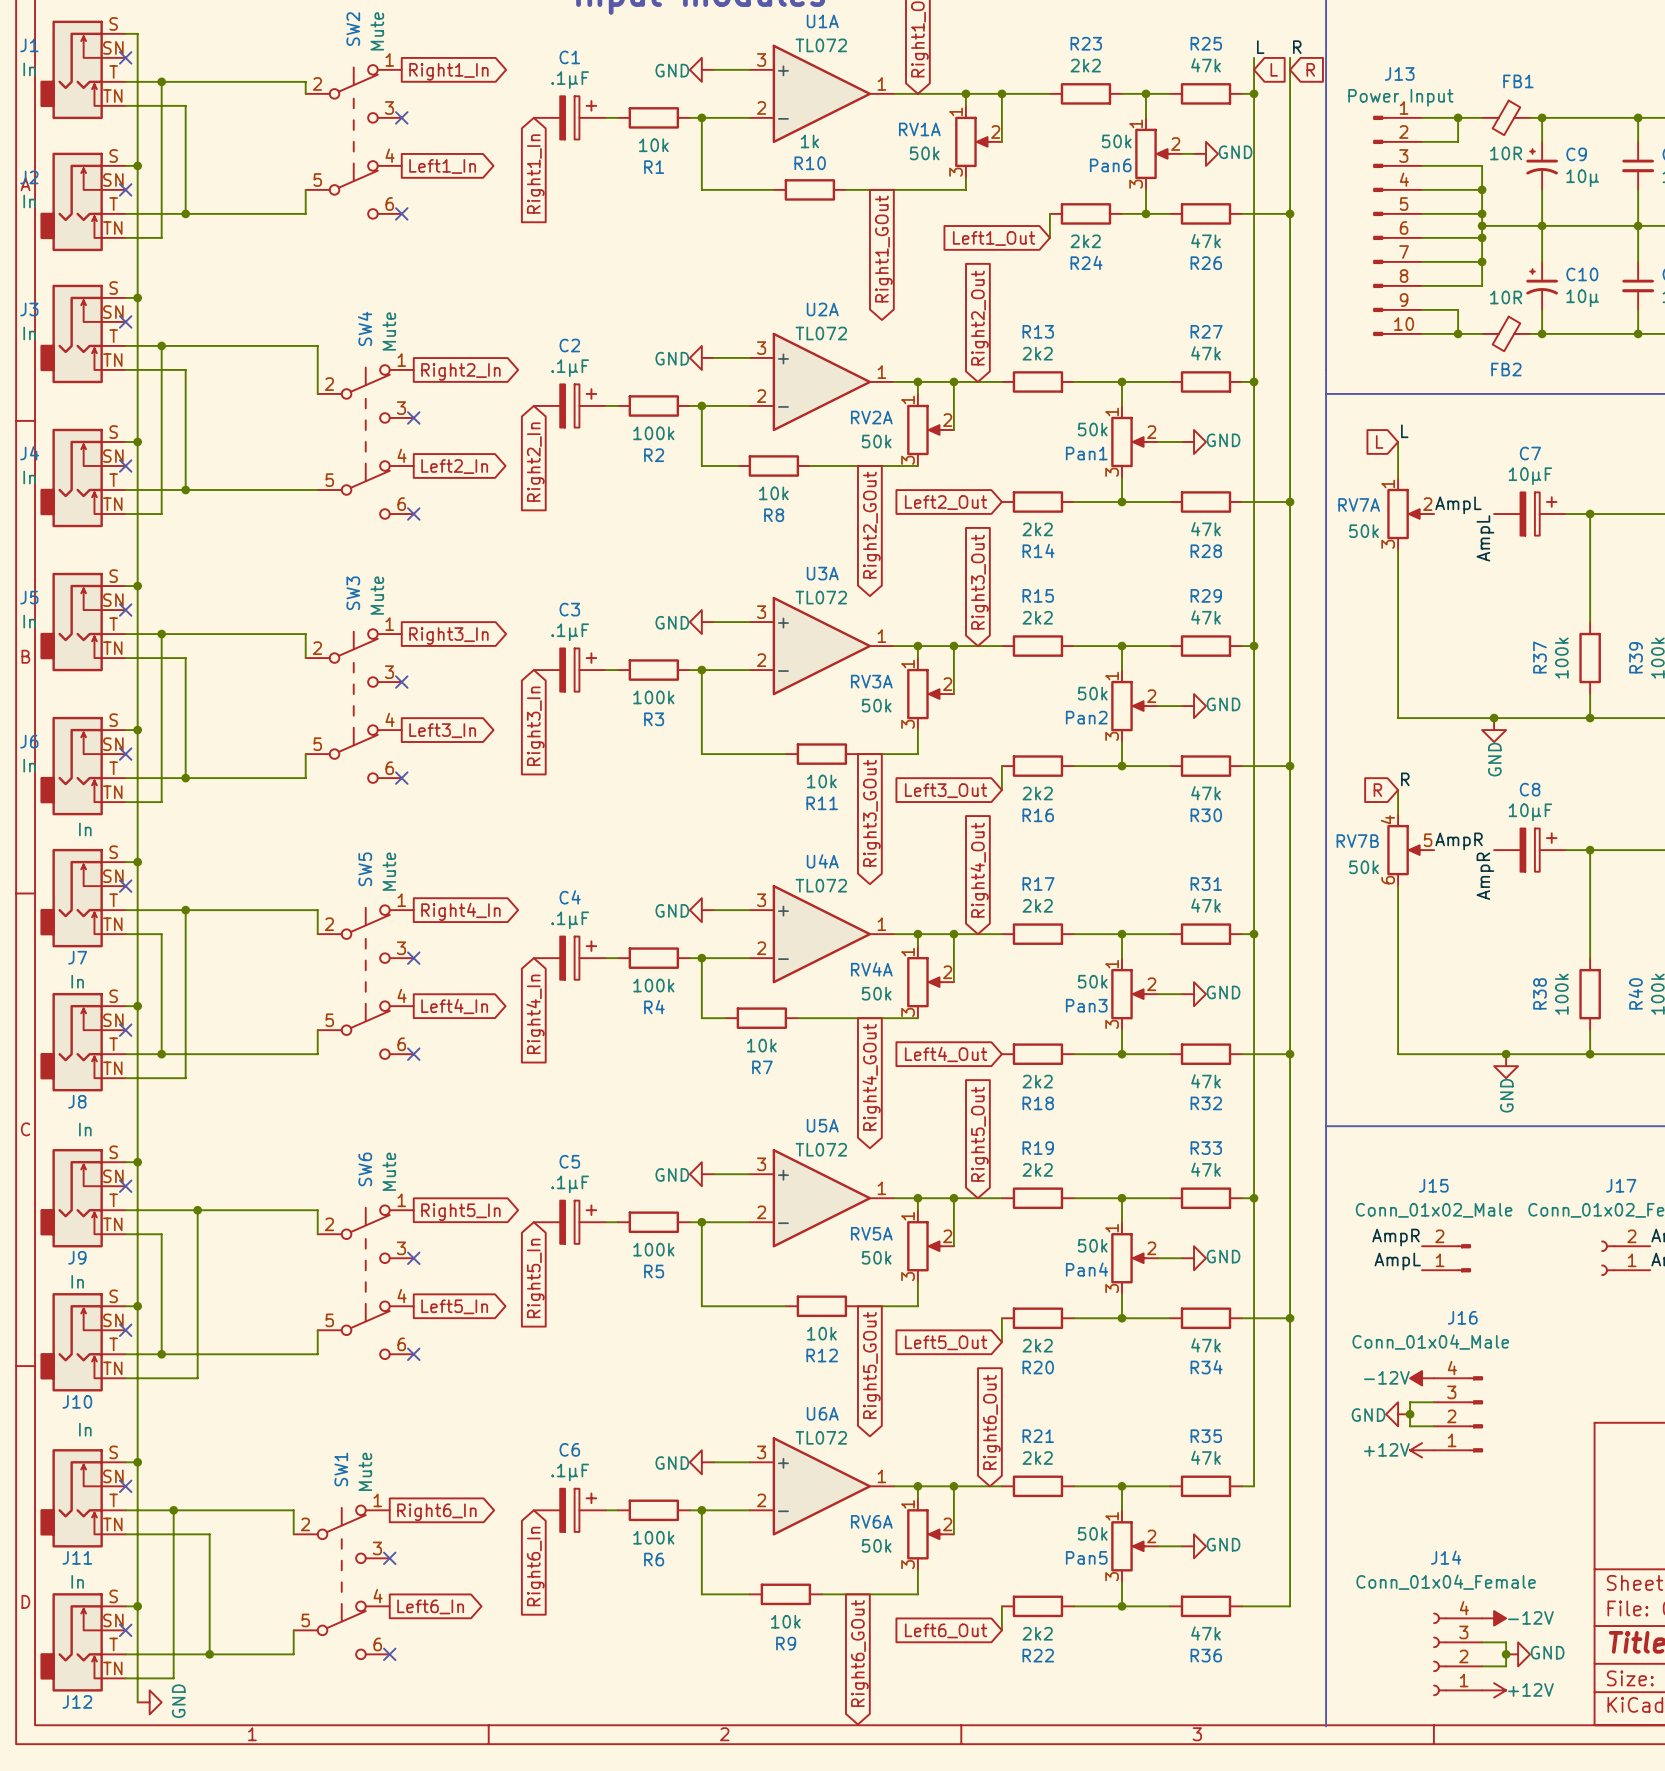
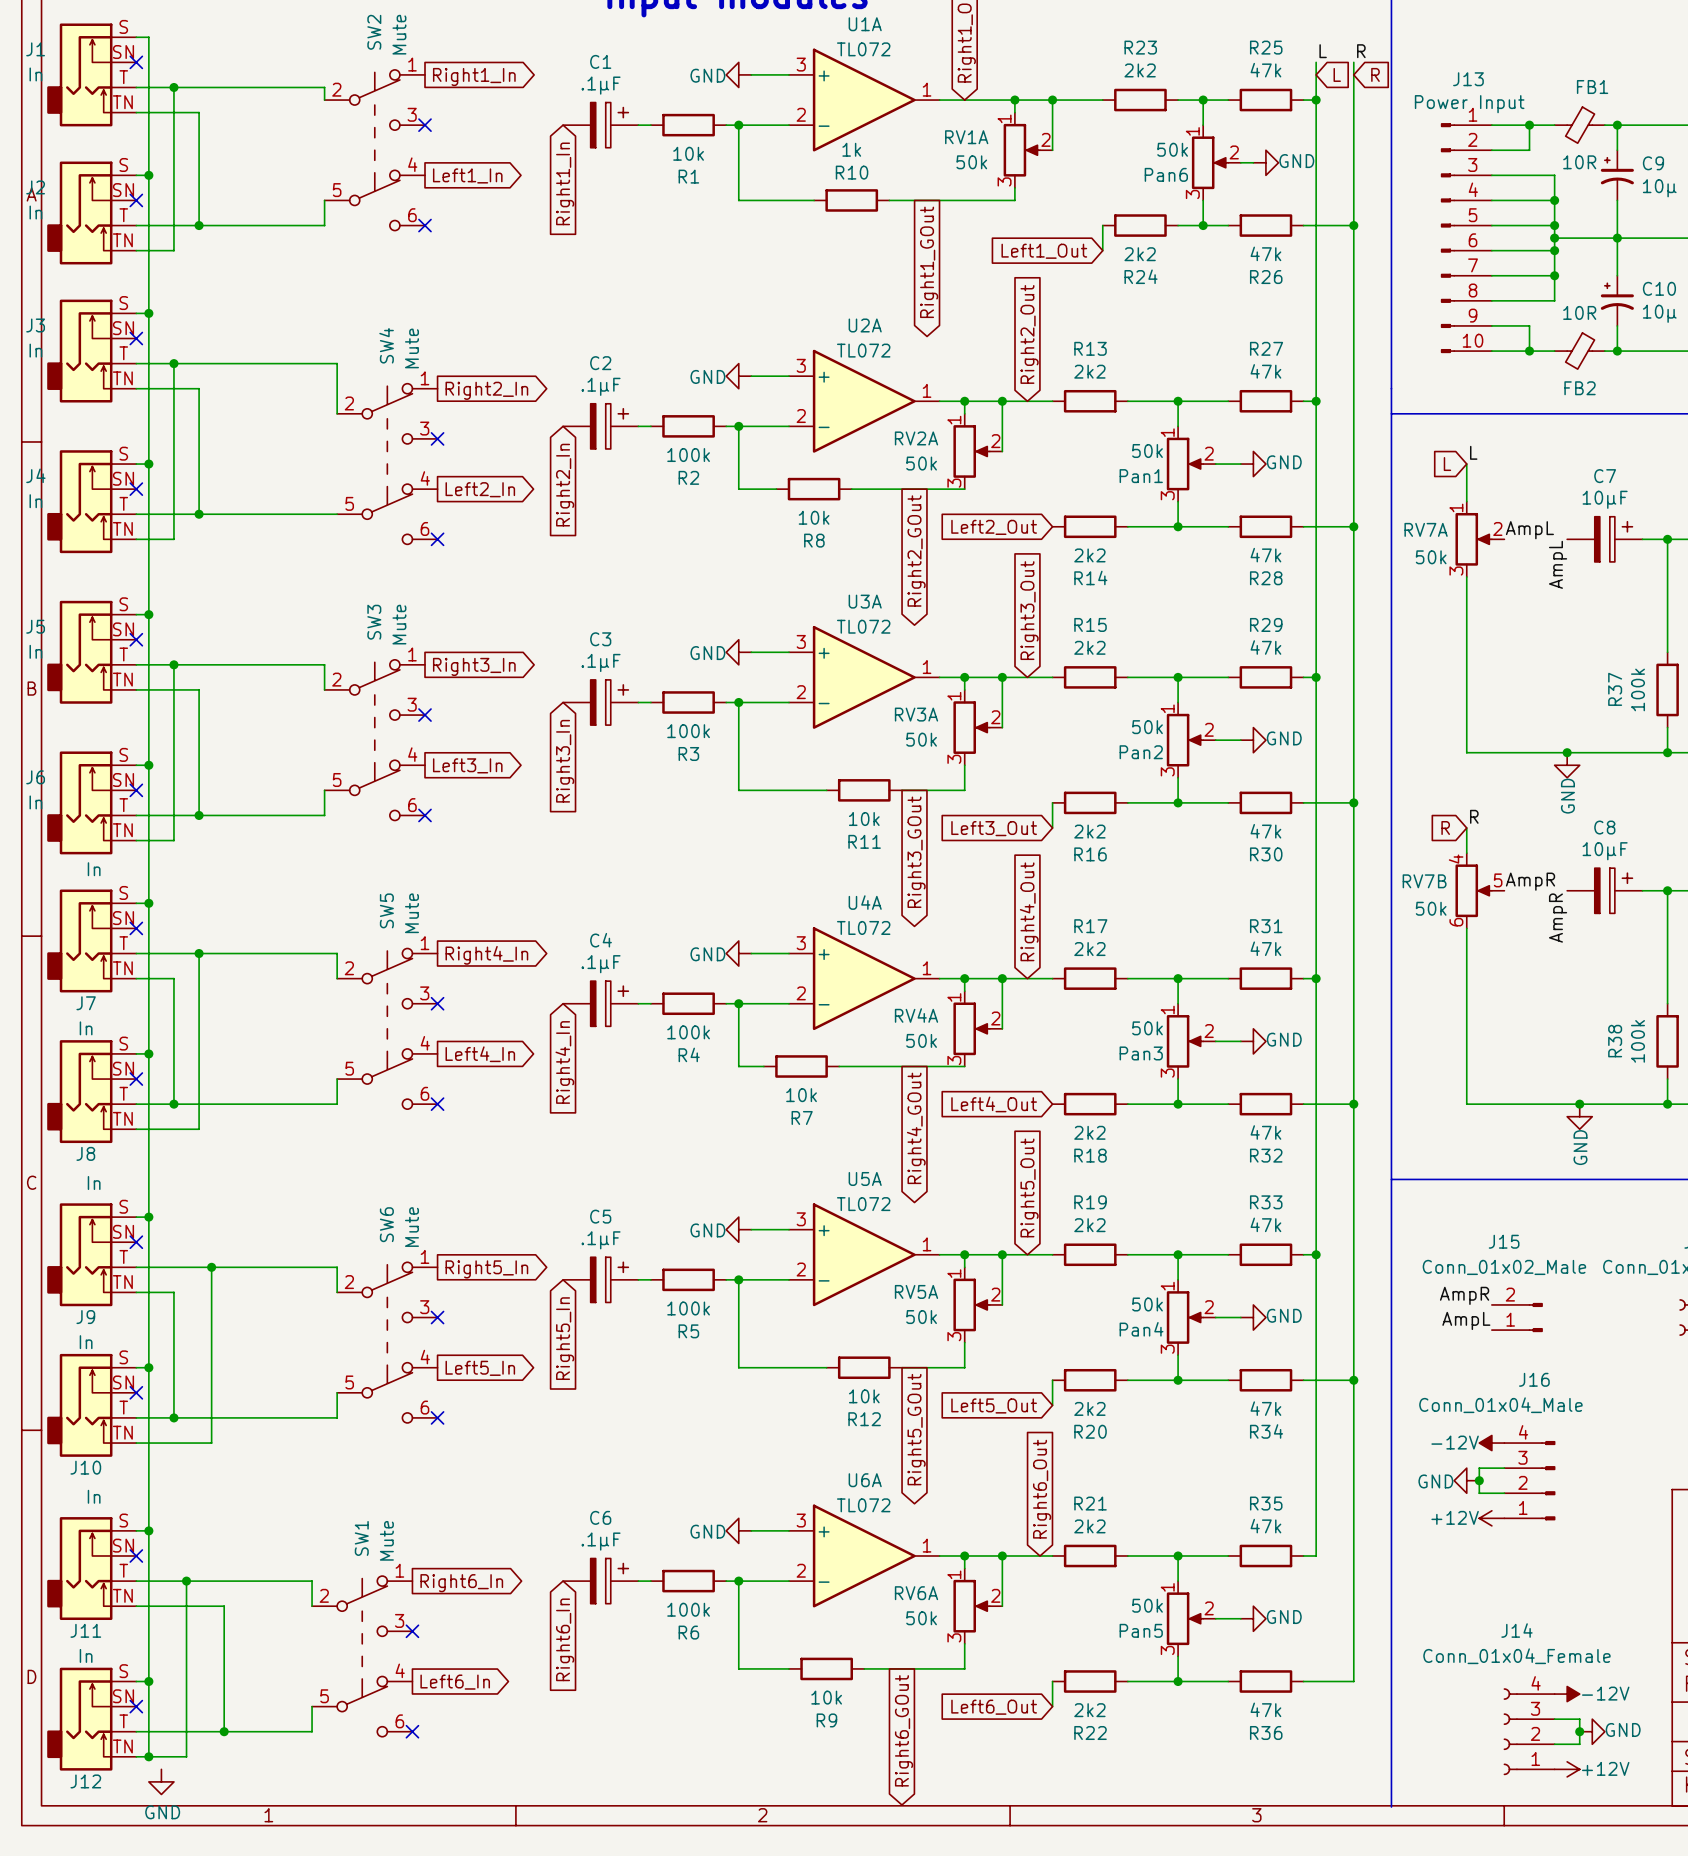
wire: (137, 1678) (137, 1702) -> none
junction: none -> (148, 1756)
power symbol rotation: 0° (149, 1702) -> 90° clockwise (161, 1781)

